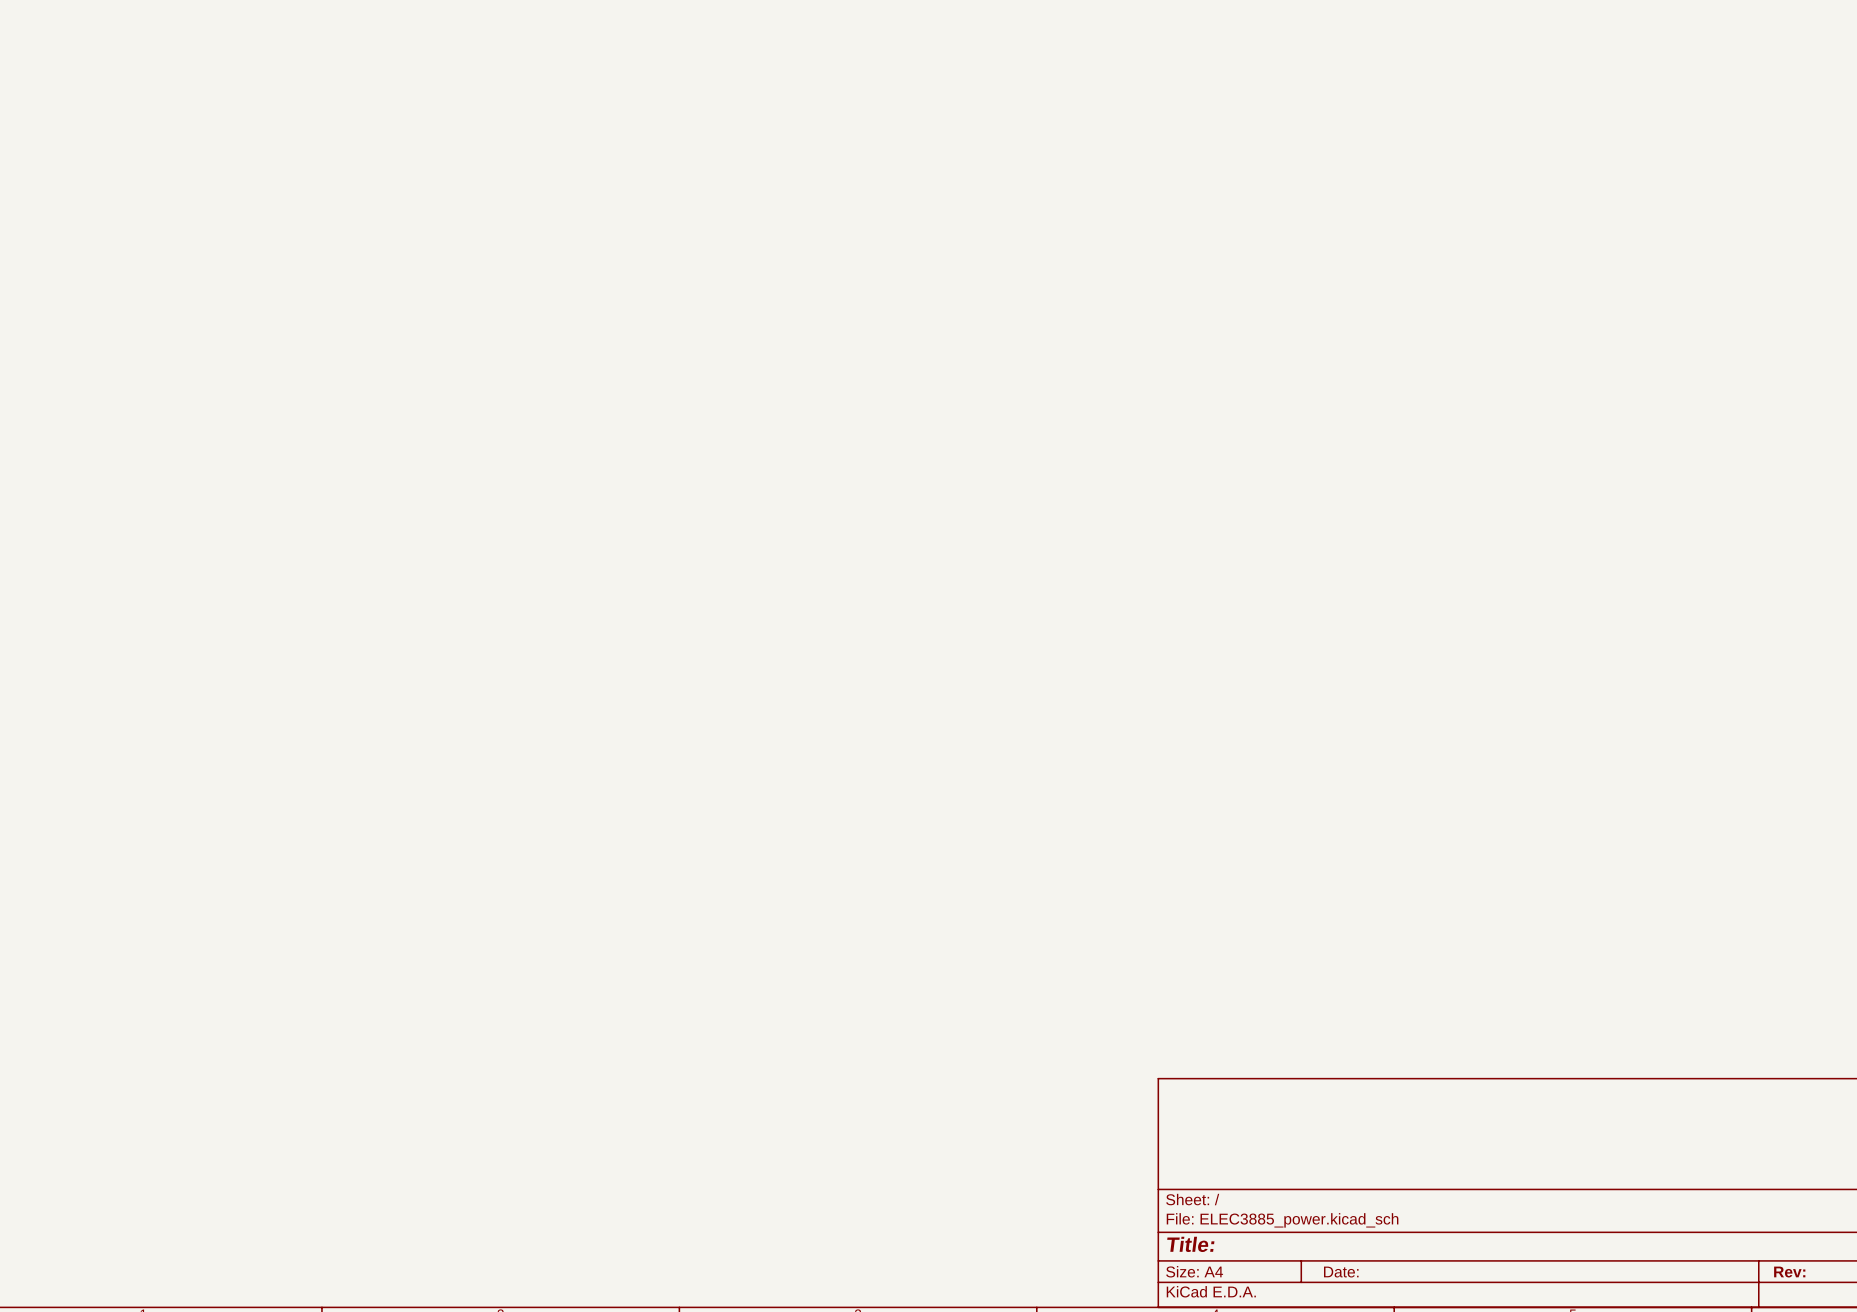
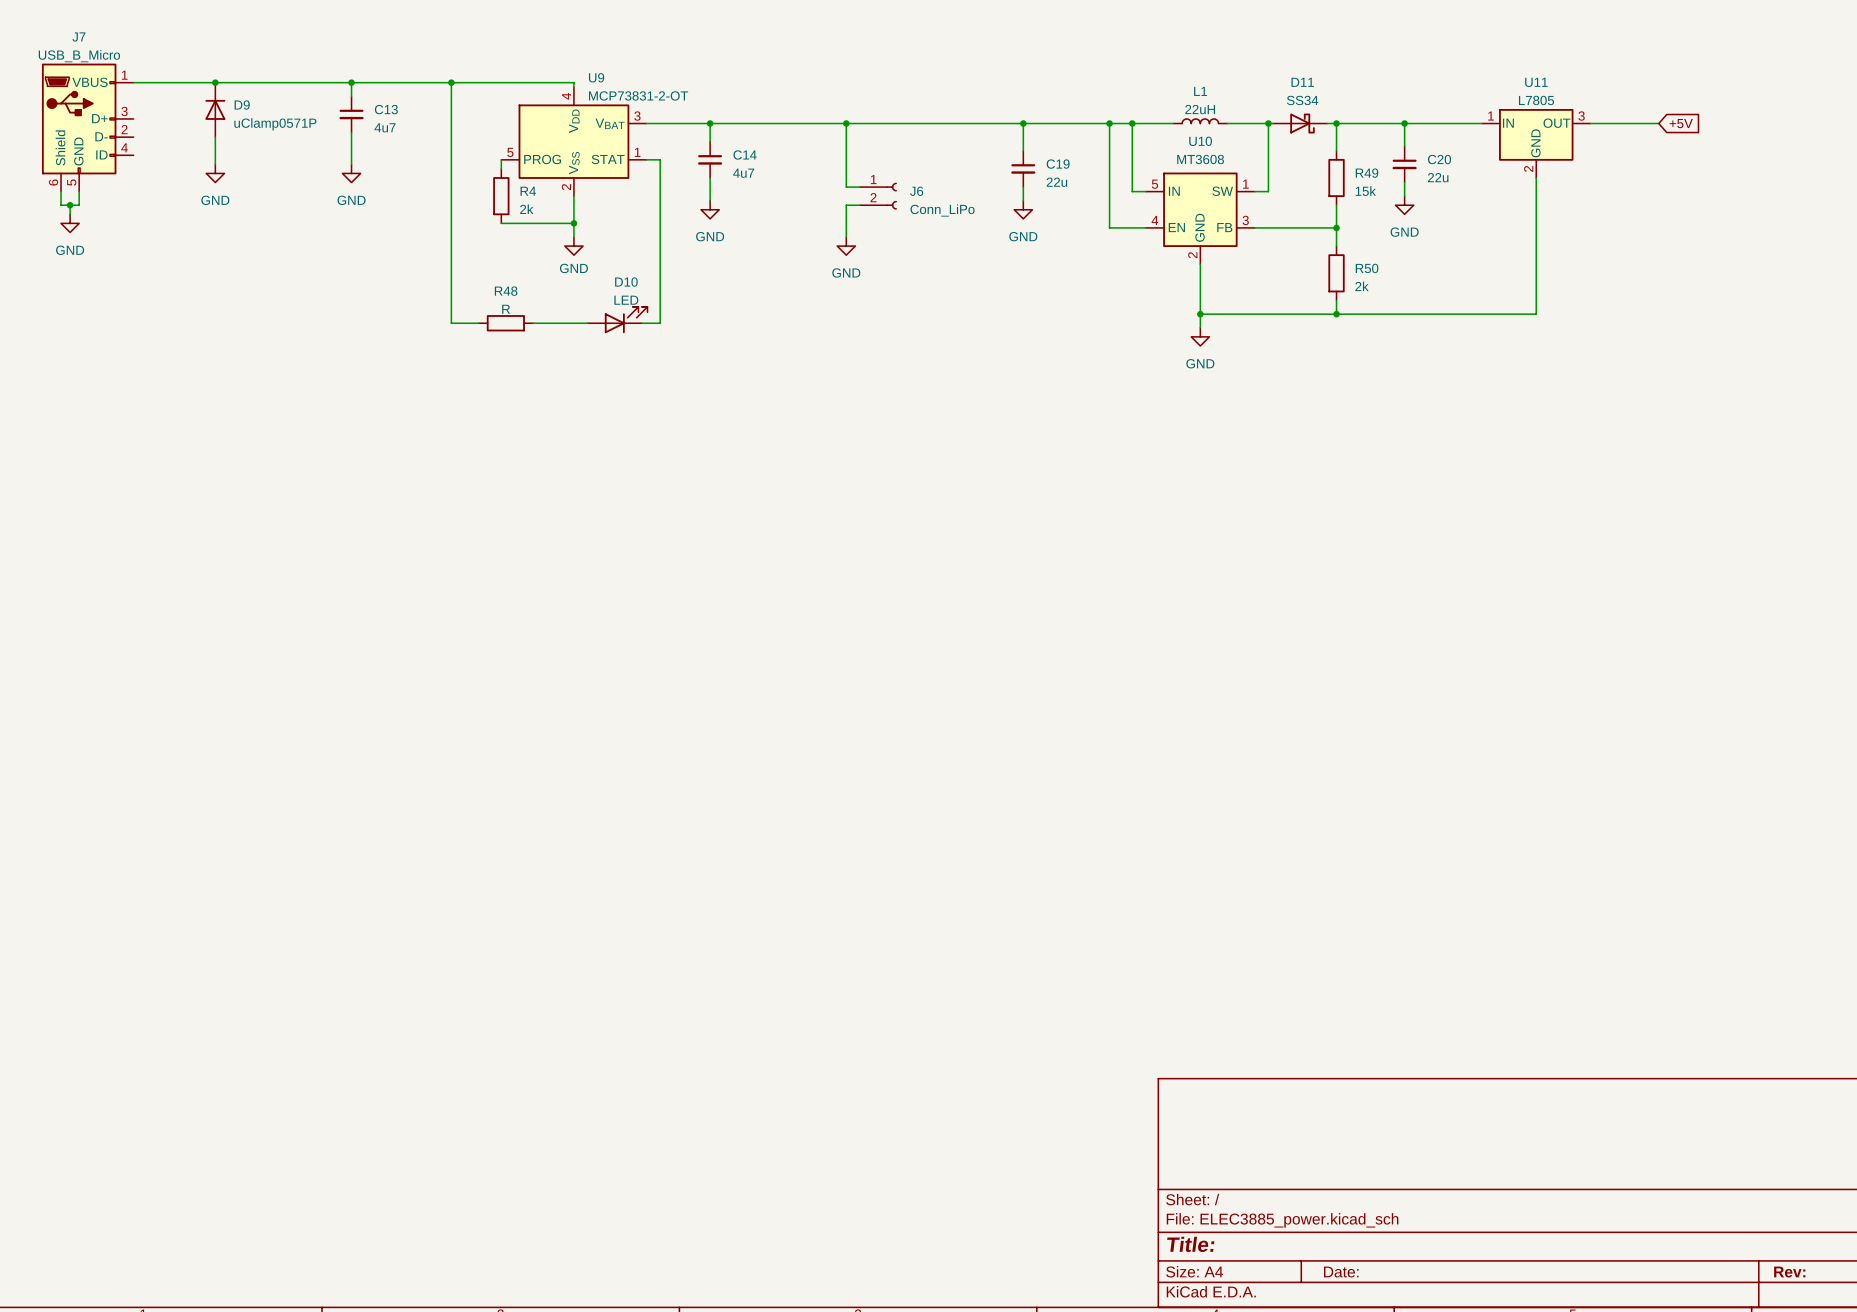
wire: none -> (133, 82) (573, 82) (573, 87)
junction: none -> (215, 82)
wire: none -> (351, 82) (351, 96)
junction: none -> (351, 82)
wire: none -> (451, 82) (451, 323) (478, 323)
junction: none -> (451, 82)
D9: none -> uClamp0571P (215, 109)
C13: none -> 4u7 (351, 114)
L1: none -> 22uH (1200, 121)
wire: none -> (646, 123) (1173, 123)
wire: none -> (710, 123) (710, 141)
junction: none -> (710, 123)
wire: none -> (846, 123) (846, 187) (859, 187)
junction: none -> (846, 123)
wire: none -> (1023, 123) (1023, 150)
junction: none -> (1023, 123)
wire: none -> (1109, 123) (1109, 227) (1145, 227)
junction: none -> (1109, 123)
wire: none -> (1132, 123) (1132, 191) (1145, 191)
junction: none -> (1132, 123)
wire: none -> (1227, 123) (1272, 123)
wire: none -> (1268, 123) (1268, 191) (1254, 191)
junction: none -> (1268, 123)
D11: none -> SS34 (1300, 123)
wire: none -> (1327, 123) (1481, 123)
wire: none -> (1336, 123) (1336, 150)
junction: none -> (1336, 123)
wire: none -> (1404, 123) (1404, 146)
junction: none -> (1404, 123)
wire: none -> (1590, 123) (1658, 123)
global label: none -> +5V (1681, 123)
J7: none -> USB_B_Micro (87, 127)
wire: none -> (351, 132) (351, 164)
wire: none -> (215, 137) (215, 164)
U9: none -> MCP73831-2-OT (573, 141)
U11: none -> L7805 (1536, 143)
wire: none -> (501, 159) (501, 168)
wire: none -> (646, 159) (660, 159) (660, 323) (642, 323)
C14: none -> 4u7 (710, 159)
C20: none -> 22u (1404, 164)
C19: none -> 22u (1023, 168)
power symbol: none -> GND (215, 173)
power symbol: none -> GND (351, 173)
wire: none -> (710, 177) (710, 200)
R49: none -> 15k (1336, 177)
wire: none -> (1536, 177) (1536, 314) (1200, 314)
wire: none -> (1404, 182) (1404, 196)
wire: none -> (1023, 187) (1023, 200)
wire: none -> (61, 191) (61, 205) (79, 205) (79, 191)
R4: none -> 2k (501, 196)
wire: none -> (573, 196) (573, 237)
J6: none -> Conn_LiPo (878, 196)
wire: none -> (70, 205) (70, 214)
junction: none -> (70, 205)
wire: none -> (859, 205) (846, 205) (846, 237)
wire: none -> (1336, 205) (1336, 246)
power symbol: none -> GND (1404, 205)
power symbol: none -> GND (710, 209)
power symbol: none -> GND (1023, 209)
U10: none -> MT3608 (1200, 218)
power symbol: none -> GND (70, 223)
wire: none -> (501, 223) (573, 223)
junction: none -> (573, 223)
wire: none -> (1254, 227) (1336, 227)
junction: none -> (1336, 227)
power symbol: none -> GND (573, 246)
power symbol: none -> GND (846, 246)
wire: none -> (1200, 264) (1200, 327)
R50: none -> 2k (1336, 273)
wire: none -> (1336, 300) (1336, 314)
junction: none -> (1200, 314)
junction: none -> (1336, 314)
D10: none -> LED (617, 320)
R48: none -> R (505, 323)
wire: none -> (533, 323) (587, 323)
power symbol: none -> GND (1200, 336)

